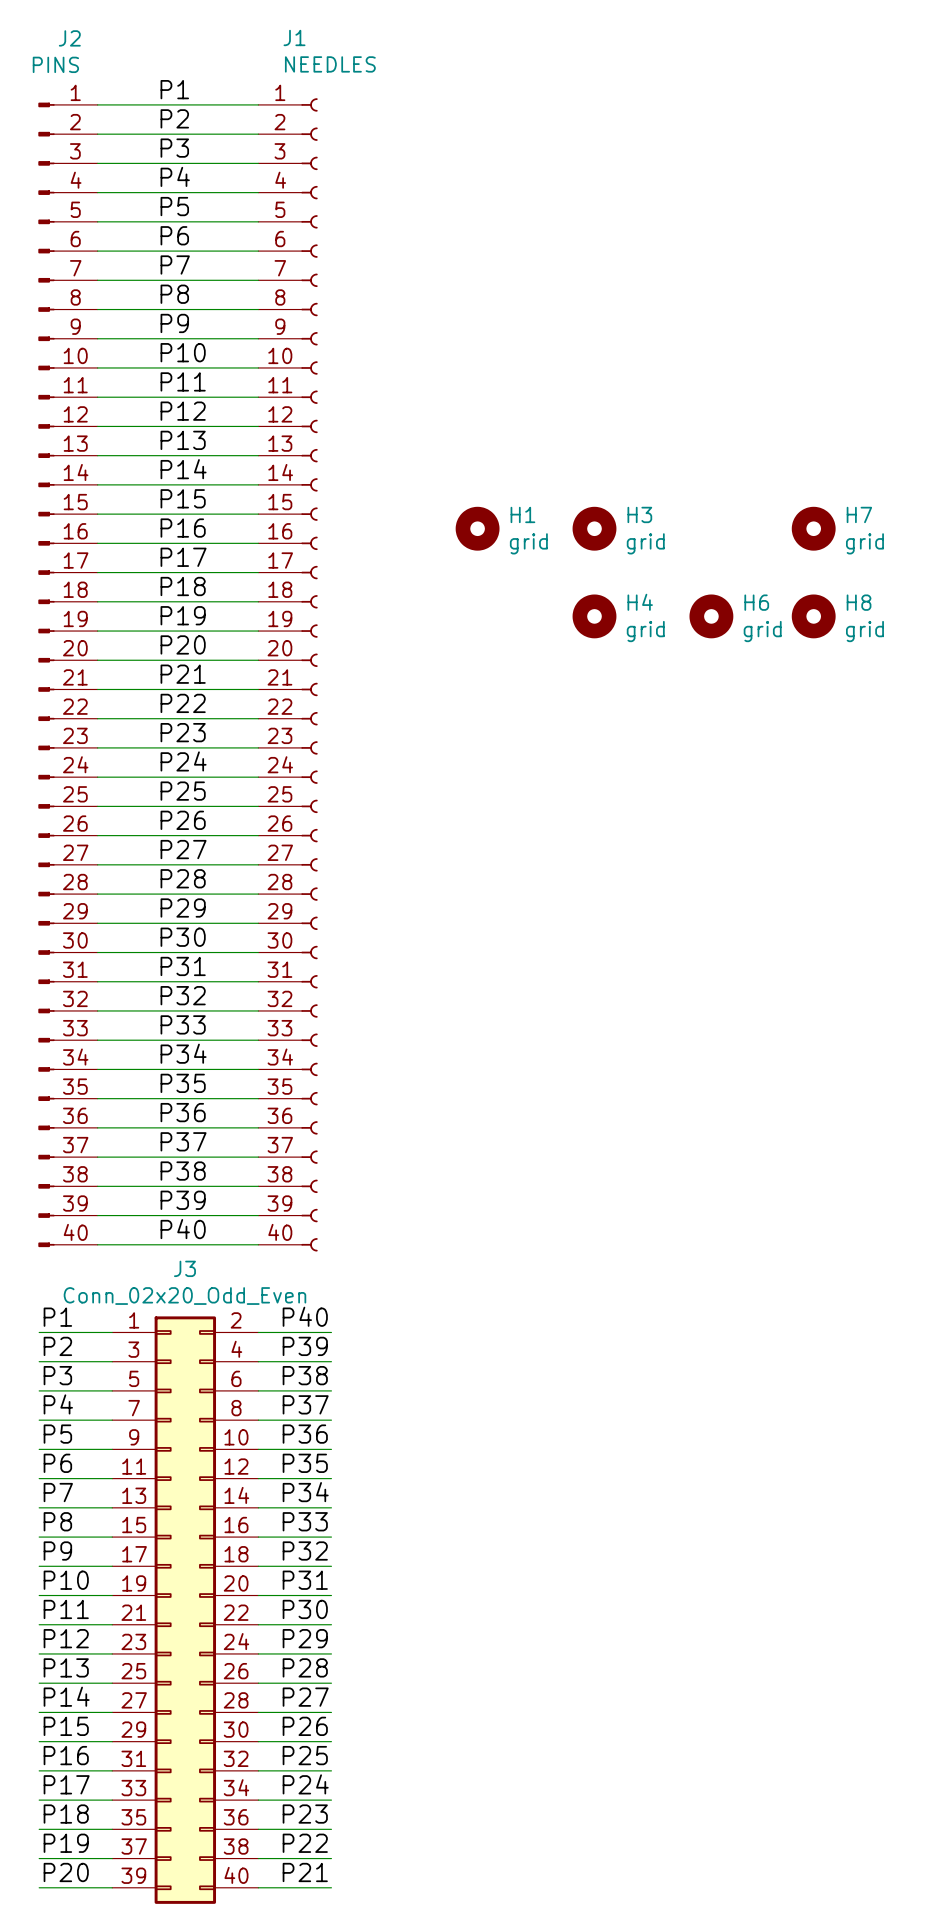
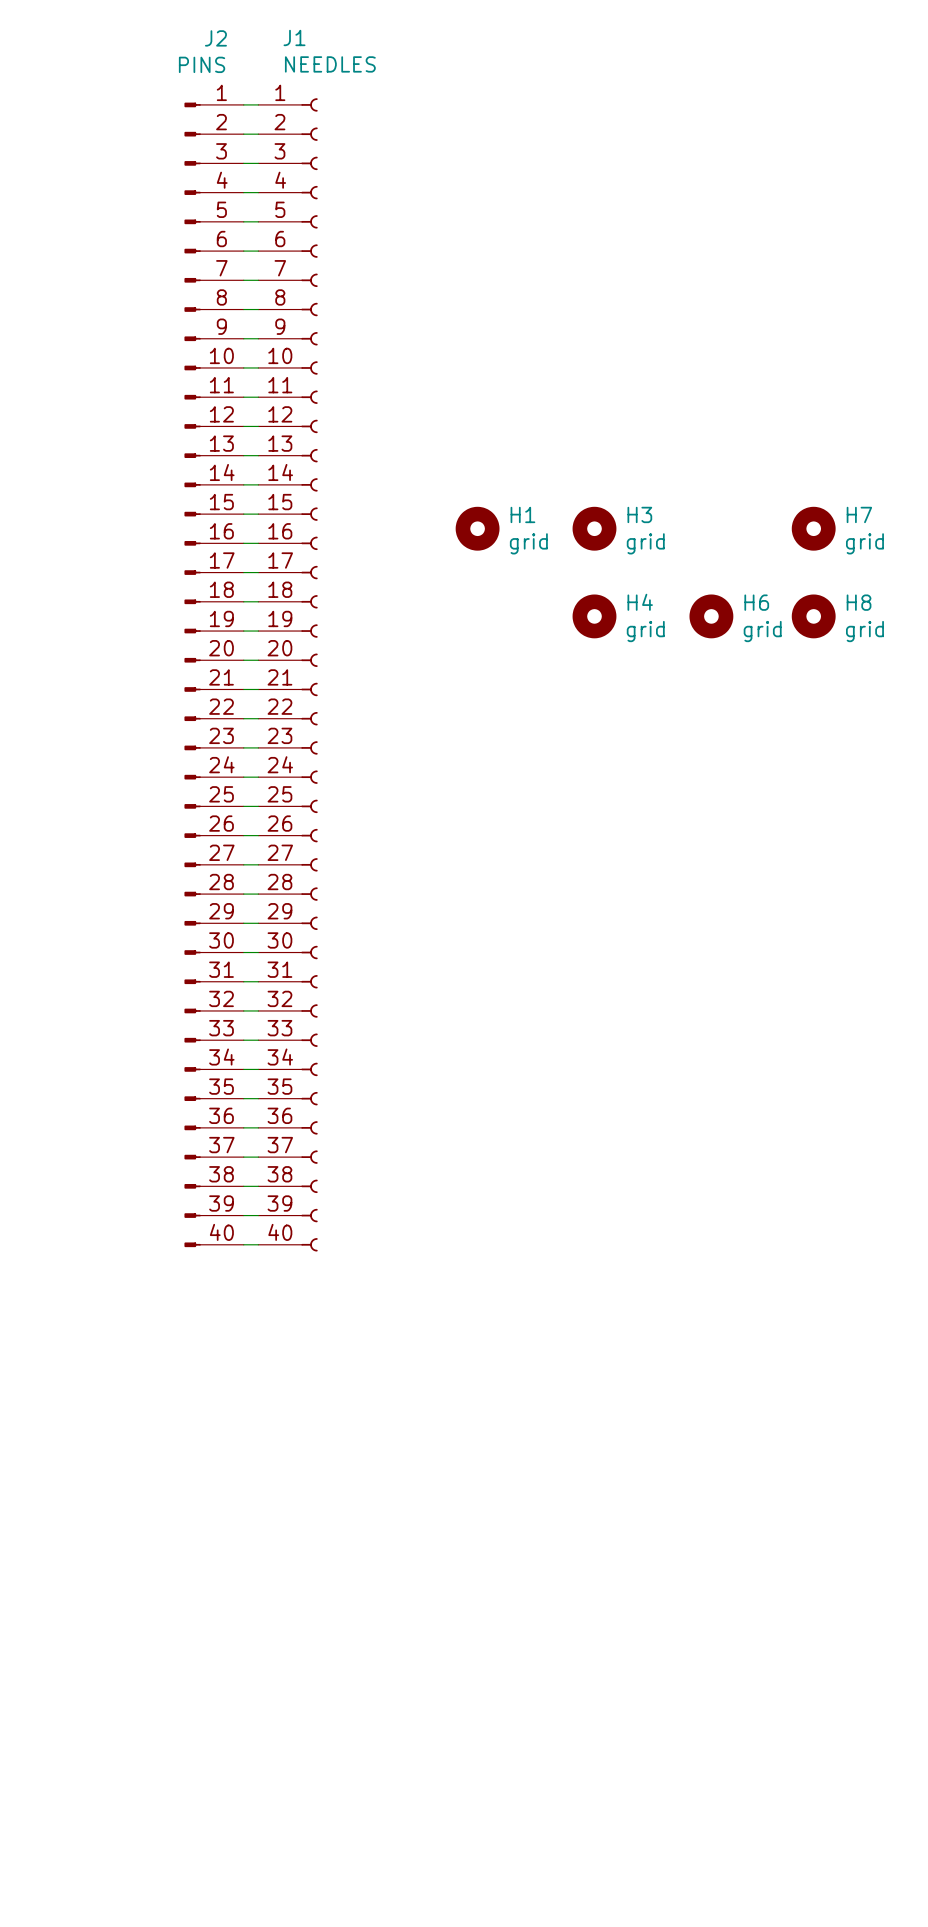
label: P1 (174, 89) -> none
wire: (97, 104) (243, 104) -> none
label: P2 (174, 118) -> none
wire: (97, 134) (243, 134) -> none
label: P3 (174, 148) -> none
wire: (97, 163) (243, 163) -> none
label: P4 (175, 176) -> none
wire: (97, 192) (243, 192) -> none
label: P5 (174, 206) -> none
wire: (97, 221) (243, 221) -> none
label: P6 (174, 235) -> none
wire: (97, 251) (243, 251) -> none
label: P7 (175, 265) -> none
wire: (97, 280) (243, 280) -> none
label: P8 (174, 294) -> none
wire: (97, 309) (243, 309) -> none
label: P9 (174, 323) -> none
wire: (97, 338) (243, 338) -> none
label: P10 (183, 352) -> none
wire: (97, 367) (243, 367) -> none
label: P11 (183, 381) -> none
wire: (97, 397) (243, 397) -> none
label: P12 (183, 411) -> none
wire: (97, 426) (243, 426) -> none
label: P13 (183, 440) -> none
wire: (97, 455) (243, 455) -> none
label: P14 (183, 469) -> none
wire: (97, 484) (243, 484) -> none
label: P15 (183, 498) -> none
wire: (97, 514) (243, 514) -> none
label: P16 (183, 528) -> none
wire: (97, 543) (243, 543) -> none
label: P17 (183, 557) -> none
wire: (97, 572) (243, 572) -> none
label: P18 (183, 586) -> none
wire: (97, 601) (243, 601) -> none
label: P19 (183, 615) -> none
wire: (97, 631) (243, 631) -> none
label: P20 (183, 644) -> none
wire: (97, 660) (243, 660) -> none
J2 position: (67, 674) -> (214, 674)
label: P21 (183, 674) -> none
wire: (97, 689) (243, 689) -> none
label: P22 (183, 703) -> none
wire: (97, 718) (243, 718) -> none
label: P23 (183, 732) -> none
wire: (97, 747) (243, 747) -> none
label: P24 (183, 761) -> none
wire: (97, 777) (243, 777) -> none
label: P25 (183, 791) -> none
wire: (97, 806) (243, 806) -> none
label: P26 (183, 820) -> none
wire: (97, 835) (243, 835) -> none
label: P27 (183, 849) -> none
wire: (97, 864) (243, 864) -> none
label: P28 (183, 878) -> none
wire: (97, 894) (243, 894) -> none
label: P29 (183, 908) -> none
wire: (97, 923) (243, 923) -> none
label: P30 (183, 937) -> none
wire: (97, 952) (243, 952) -> none
label: P31 (183, 966) -> none
wire: (97, 981) (243, 981) -> none
label: P32 (183, 995) -> none
wire: (97, 1010) (243, 1010) -> none
label: P33 (183, 1024) -> none
wire: (97, 1040) (243, 1040) -> none
label: P34 (183, 1053) -> none
wire: (97, 1069) (243, 1069) -> none
label: P35 (183, 1083) -> none
wire: (97, 1098) (243, 1098) -> none
label: P36 (183, 1112) -> none
wire: (97, 1127) (243, 1127) -> none
label: P37 (183, 1141) -> none
wire: (97, 1157) (243, 1157) -> none
label: P38 (183, 1171) -> none
wire: (97, 1186) (243, 1186) -> none
label: P39 (183, 1200) -> none
wire: (97, 1215) (243, 1215) -> none
label: P40 (183, 1229) -> none
wire: (97, 1244) (243, 1244) -> none
label: P40 (305, 1316) -> none
label: P1 (57, 1317) -> none
wire: (39, 1332) (112, 1332) -> none
wire: (258, 1332) (331, 1332) -> none
label: P2 (57, 1346) -> none
label: P39 (305, 1346) -> none
wire: (39, 1361) (112, 1361) -> none
wire: (258, 1361) (331, 1361) -> none
label: P3 (57, 1375) -> none
label: P38 (305, 1375) -> none
wire: (39, 1390) (112, 1390) -> none
wire: (258, 1390) (331, 1390) -> none
label: P4 (58, 1404) -> none
label: P37 (305, 1404) -> none
wire: (39, 1420) (112, 1420) -> none
wire: (258, 1420) (331, 1420) -> none
label: P5 (57, 1434) -> none
label: P36 (305, 1434) -> none
wire: (39, 1449) (112, 1449) -> none
wire: (258, 1449) (331, 1449) -> none
label: P6 (57, 1463) -> none
label: P35 (305, 1463) -> none
wire: (39, 1478) (112, 1478) -> none
wire: (258, 1478) (331, 1478) -> none
label: P7 (58, 1492) -> none
label: P34 (305, 1492) -> none
wire: (39, 1507) (112, 1507) -> none
wire: (258, 1507) (331, 1507) -> none
label: P8 (57, 1521) -> none
label: P33 (305, 1521) -> none
wire: (39, 1537) (112, 1537) -> none
wire: (258, 1537) (331, 1537) -> none
label: P9 (57, 1550) -> none
label: P32 (305, 1550) -> none
wire: (39, 1566) (112, 1566) -> none
wire: (258, 1566) (331, 1566) -> none
label: P10 (66, 1580) -> none
label: P31 (305, 1580) -> none
wire: (39, 1595) (112, 1595) -> none
wire: (258, 1595) (331, 1595) -> none
label: P11 (66, 1609) -> none
label: P30 (305, 1609) -> none
J3: Conn_02x20_Odd_Even (185, 1610) -> none
wire: (39, 1624) (112, 1624) -> none
wire: (258, 1624) (331, 1624) -> none
label: P12 (66, 1638) -> none
label: P29 (305, 1638) -> none
wire: (39, 1653) (112, 1653) -> none
wire: (258, 1653) (331, 1653) -> none
label: P13 (66, 1667) -> none
label: P28 (305, 1667) -> none
wire: (39, 1683) (112, 1683) -> none
wire: (258, 1683) (331, 1683) -> none
label: P14 (66, 1696) -> none
label: P27 (305, 1697) -> none
wire: (39, 1712) (112, 1712) -> none
wire: (258, 1712) (331, 1712) -> none
label: P15 (66, 1726) -> none
label: P26 (305, 1726) -> none
wire: (39, 1741) (112, 1741) -> none
wire: (258, 1741) (331, 1741) -> none
label: P16 (66, 1755) -> none
label: P25 (305, 1755) -> none
wire: (39, 1770) (112, 1770) -> none
wire: (258, 1770) (331, 1770) -> none
label: P17 (66, 1784) -> none
label: P24 (305, 1784) -> none
wire: (39, 1800) (112, 1800) -> none
wire: (258, 1800) (331, 1800) -> none
label: P18 (66, 1814) -> none
label: P23 (305, 1814) -> none
wire: (39, 1829) (112, 1829) -> none
wire: (258, 1829) (331, 1829) -> none
label: P19 (66, 1843) -> none
label: P22 (305, 1843) -> none
wire: (39, 1858) (112, 1858) -> none
wire: (258, 1858) (331, 1858) -> none
label: P20 (66, 1872) -> none
label: P21 (305, 1872) -> none
wire: (39, 1887) (112, 1887) -> none
wire: (258, 1887) (331, 1887) -> none

